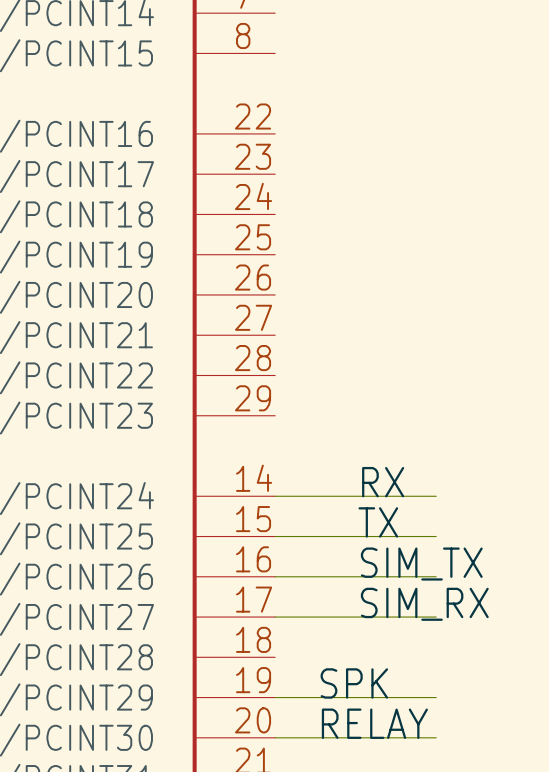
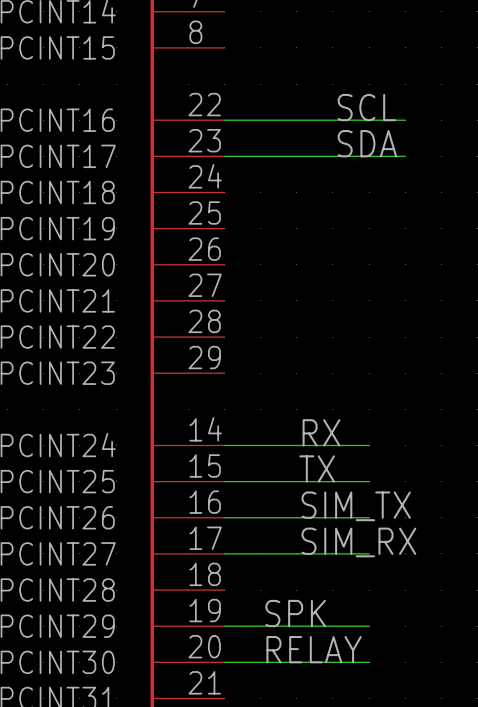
label: none -> SCL (366, 107)
wire: none -> (224, 120) (405, 120)
label: none -> SDA (367, 143)
wire: none -> (224, 156) (405, 156)

